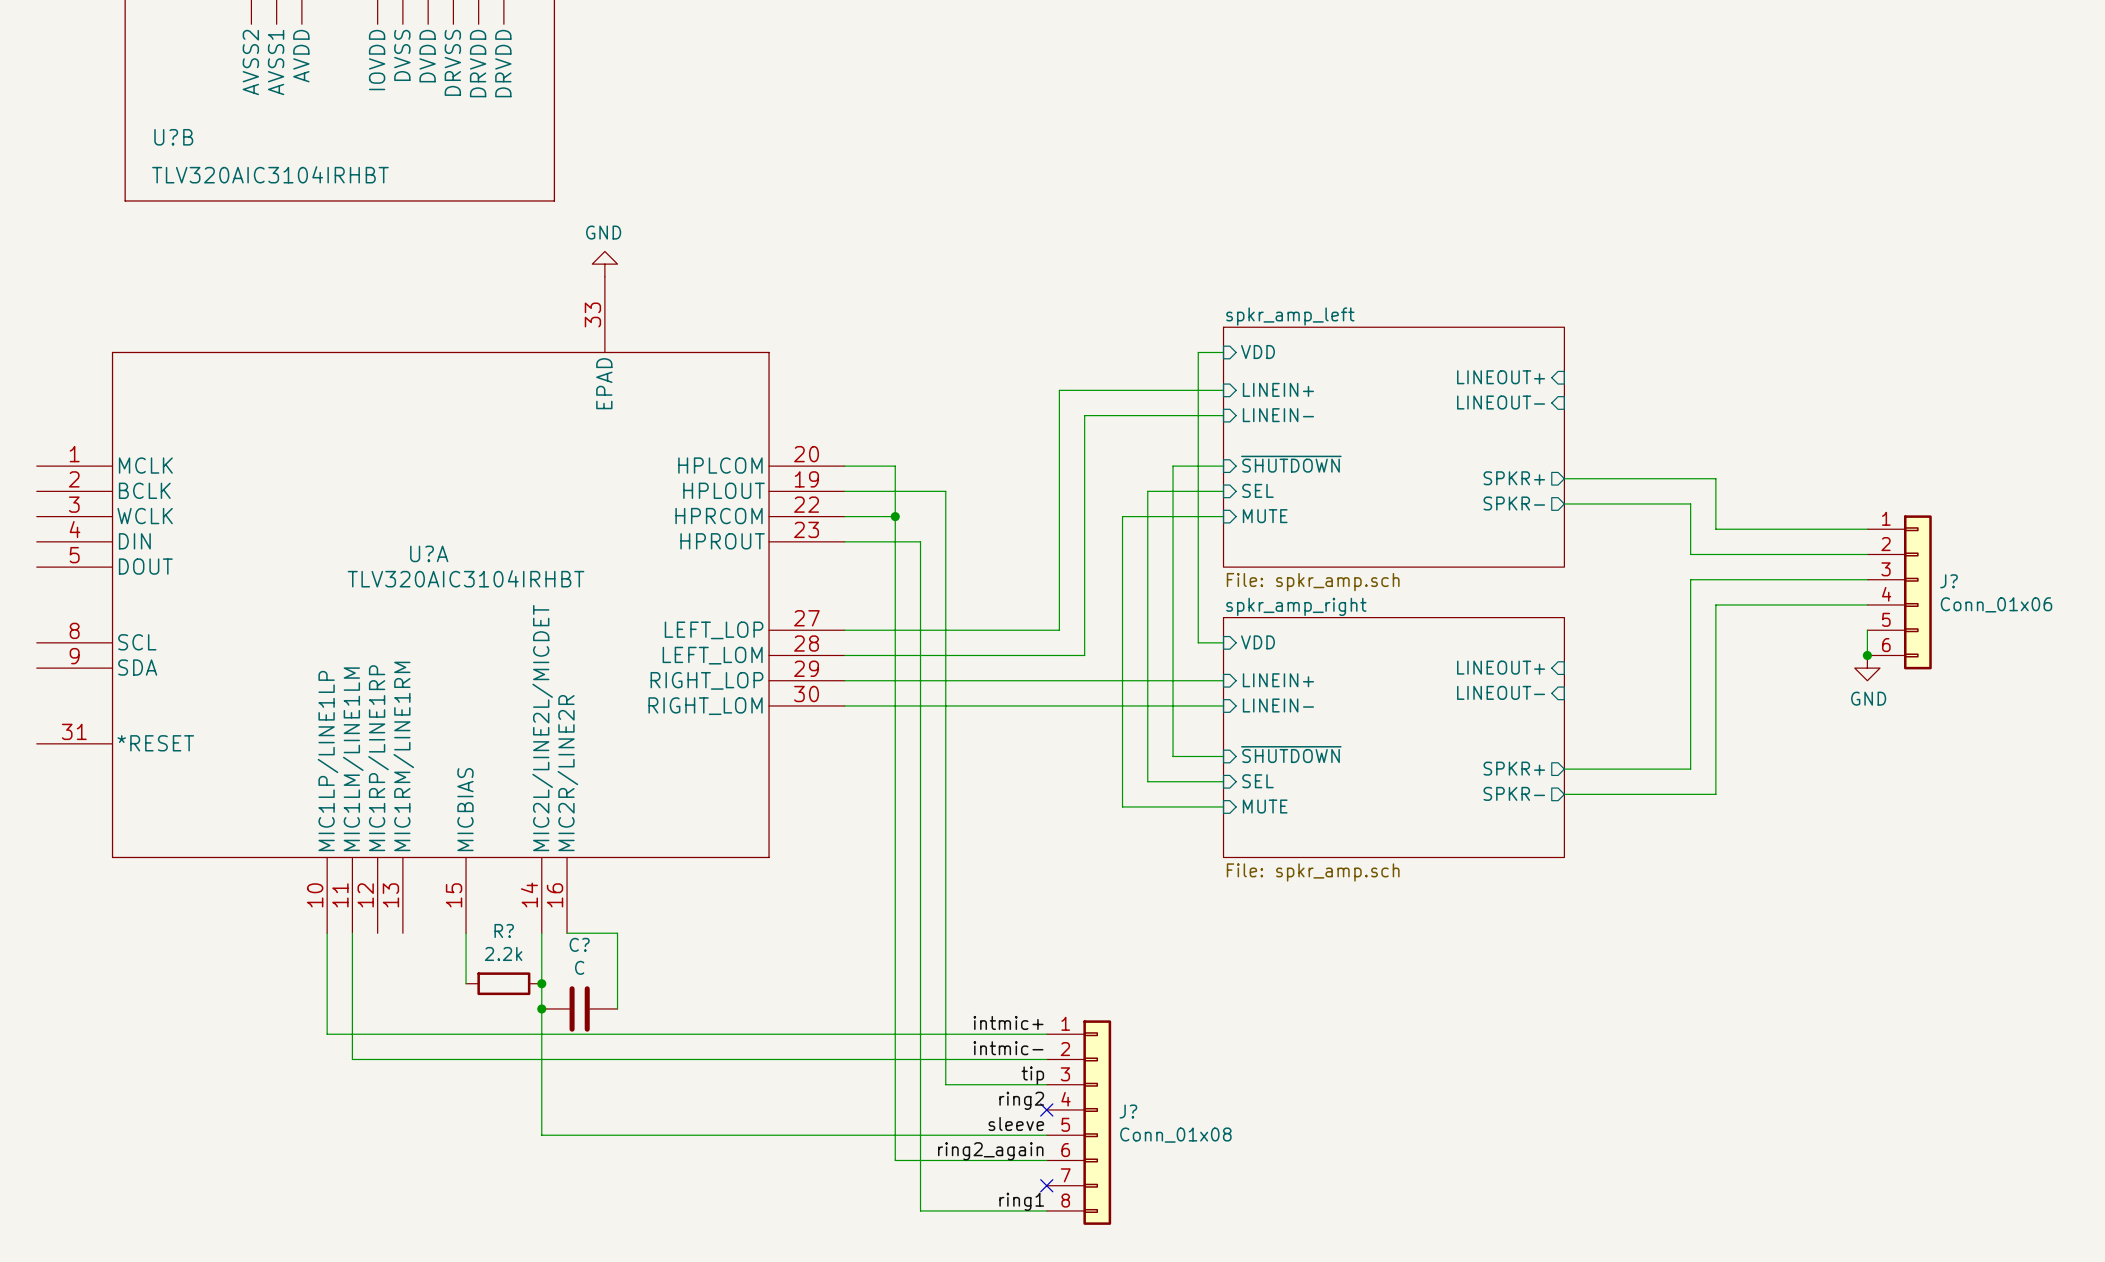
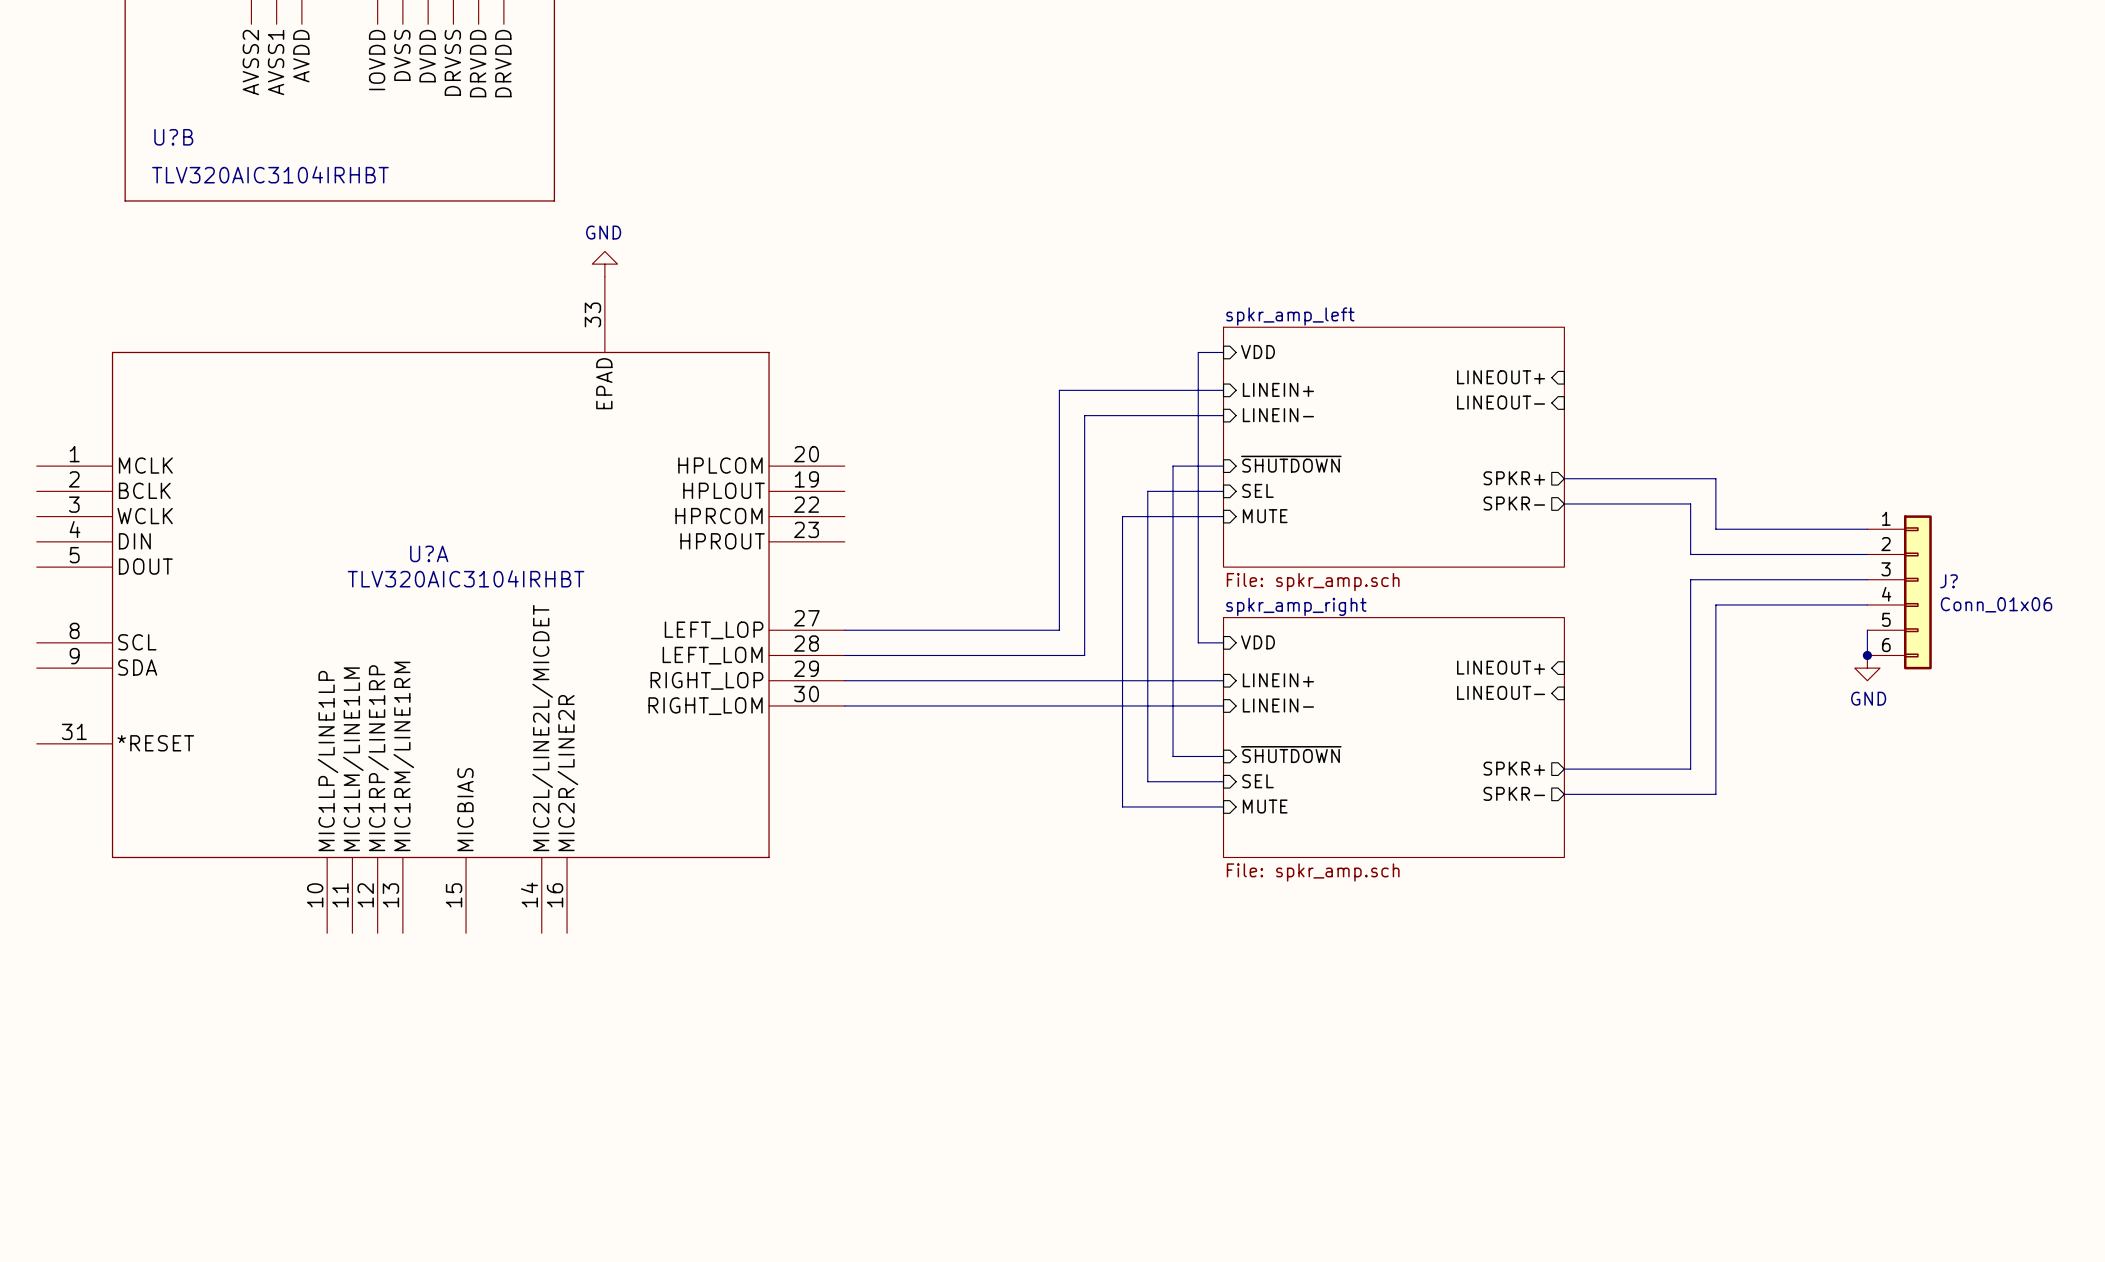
wire: (844, 466) (895, 466) (895, 1160) (1046, 1160) -> none
wire: (844, 491) (945, 491) (945, 1084) (1046, 1084) -> none
wire: (844, 516) (895, 516) -> none
junction: (895, 516) -> none
wire: (844, 541) (920, 541) (920, 1210) (1046, 1210) -> none
wire: (327, 933) (327, 1034) (1046, 1034) -> none
wire: (352, 933) (352, 1059) (1046, 1059) -> none
wire: (466, 933) (466, 983) -> none
wire: (541, 933) (541, 1135) (1046, 1135) -> none
wire: (567, 933) (617, 933) (617, 1008) -> none
R?: 2.2k (503, 983) -> none
junction: (541, 983) -> none
junction: (541, 1008) -> none
C?: C (579, 1008) -> none
label: intmic+ (1008, 1022) -> none
label: intmic- (1008, 1048) -> none
label: tip (1032, 1075) -> none
label: ring2 (1021, 1100) -> none
no-connect mark: (1046, 1109) -> none
J?: Conn_01x08 (1078, 1122) -> none
label: sleeve (1016, 1123) -> none
label: ring2_again (990, 1151) -> none
no-connect mark: (1046, 1185) -> none
label: ring1 (1021, 1201) -> none

